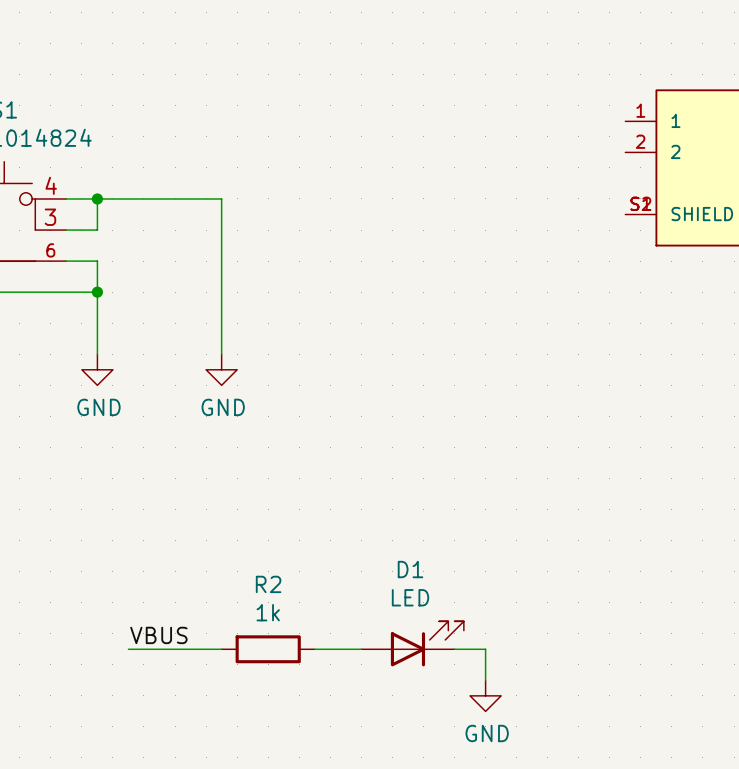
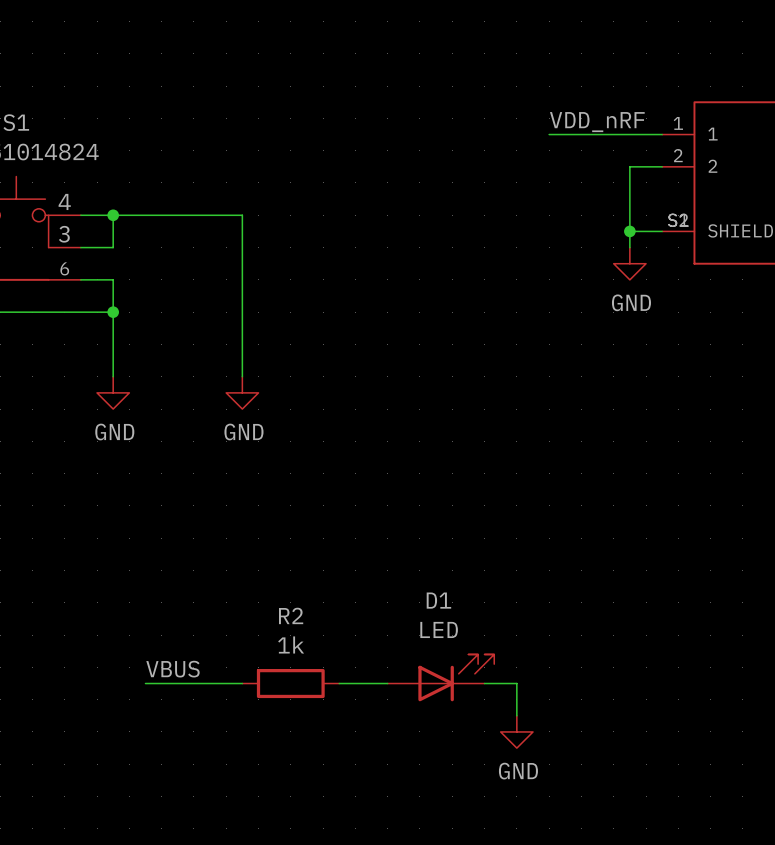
label: none -> VDD_nRF (597, 122)
wire: none -> (549, 134) (662, 134)
wire: none -> (662, 166) (629, 166) (629, 247)
wire: none -> (629, 231) (662, 231)
junction: none -> (629, 231)
power symbol: none -> GND (629, 263)

